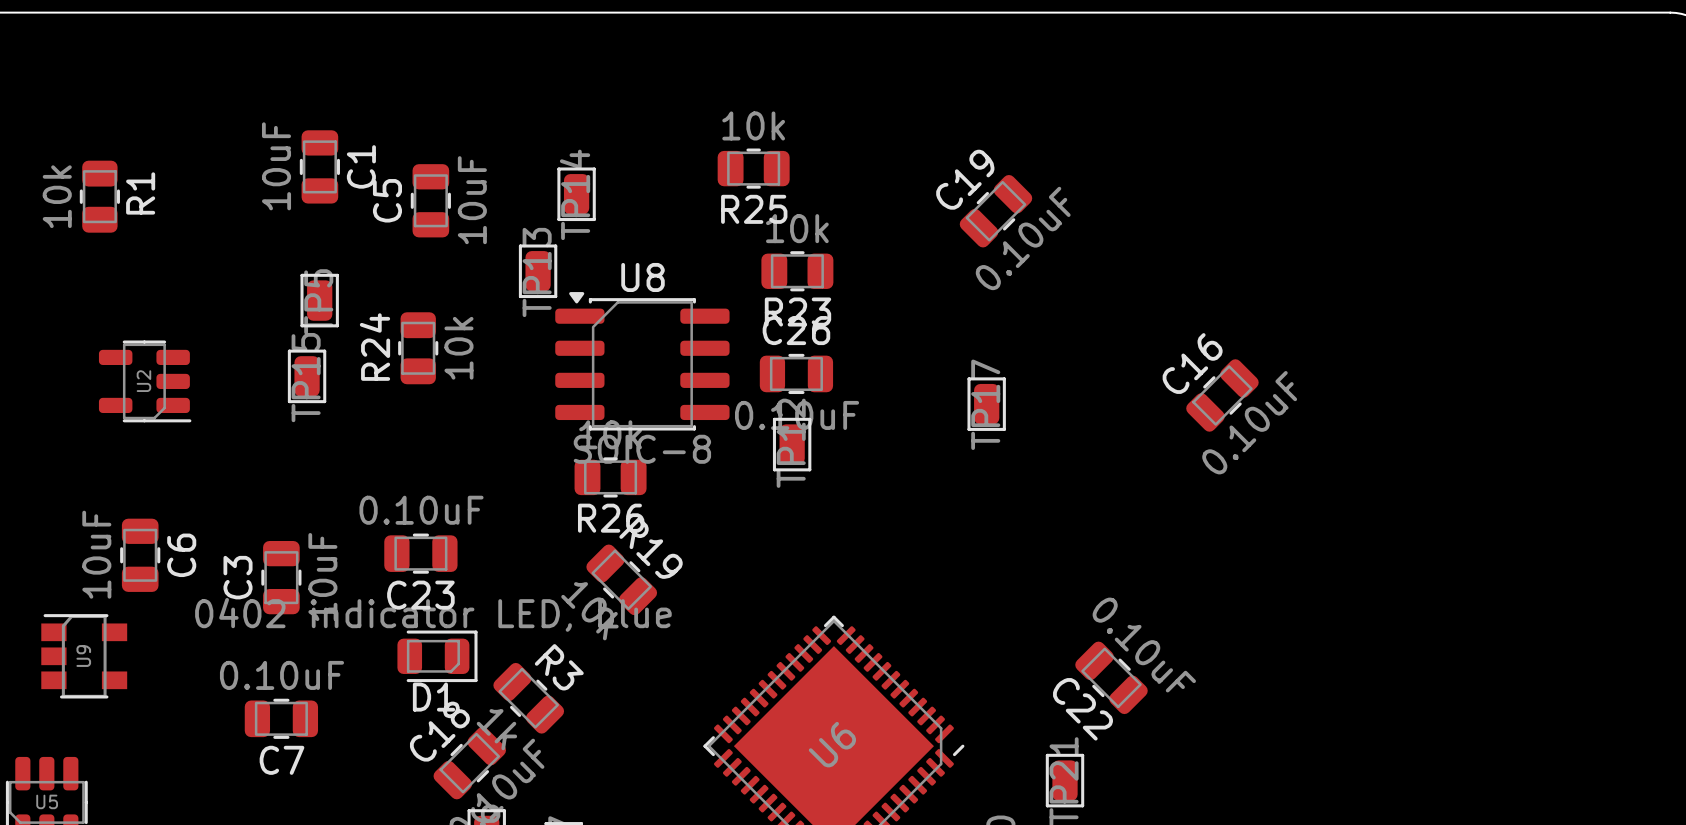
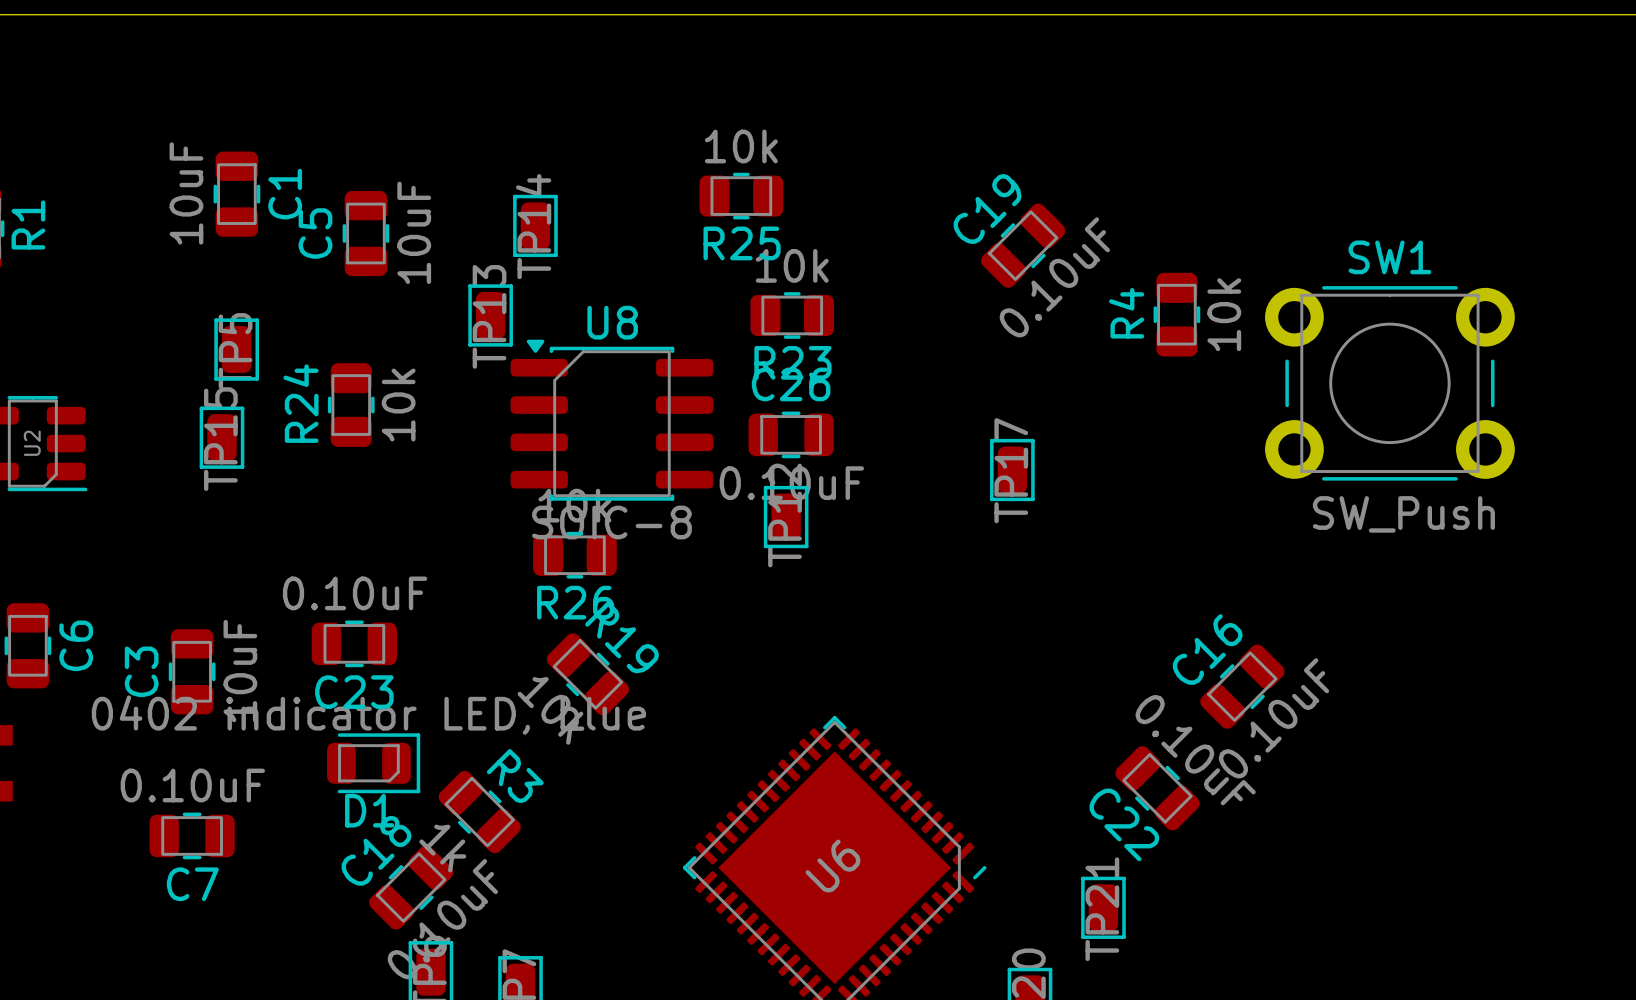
R4: none -> 10k (1176, 314)
SW1: none -> SW_Push (1389, 383)
C16 position: (1222, 395) -> (1242, 686)

